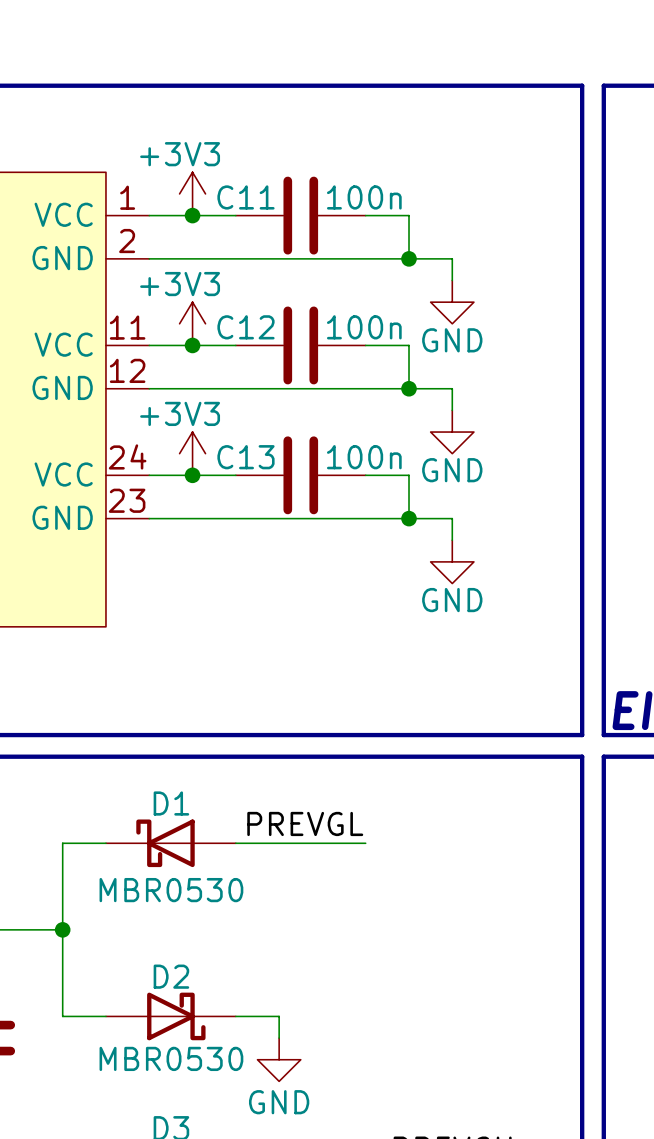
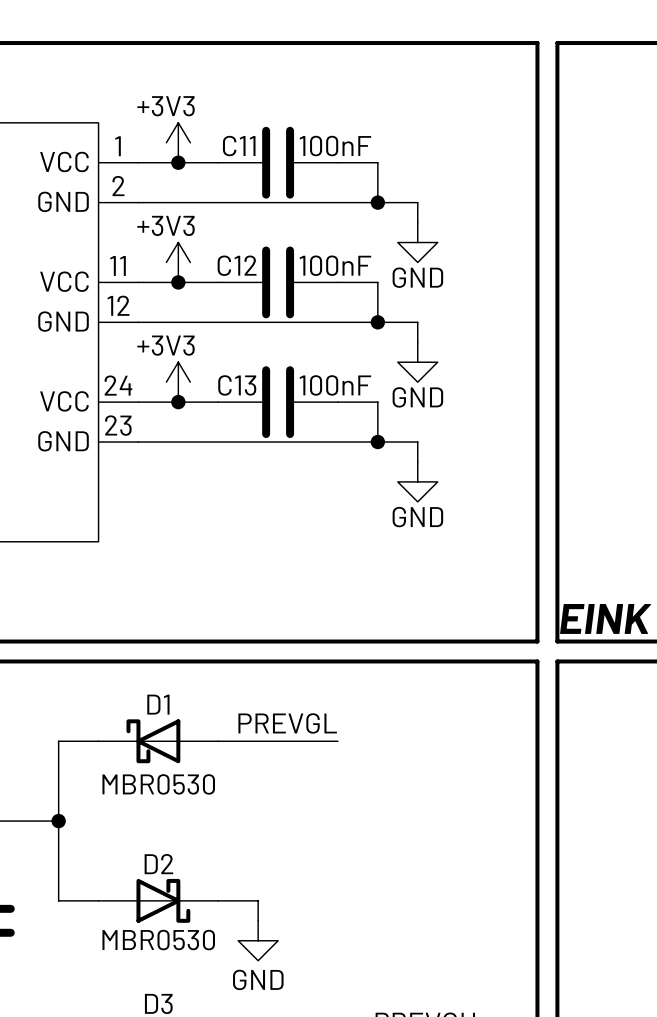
C11 value: 100n (364, 197) -> 100nF (335, 146)
C12 value: 100n (364, 327) -> 100nF (335, 265)
C13 value: 100n (364, 457) -> 100nF (335, 385)

